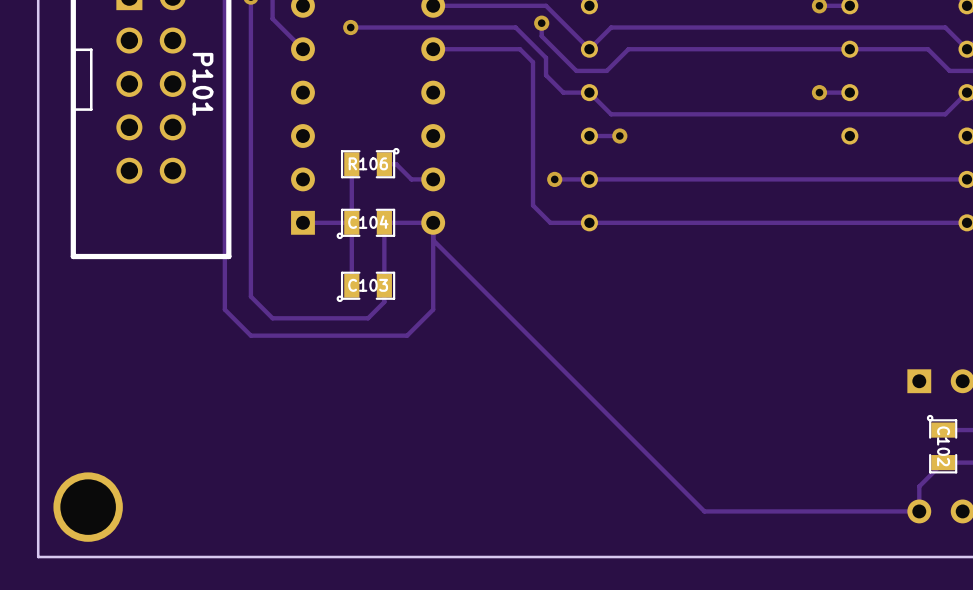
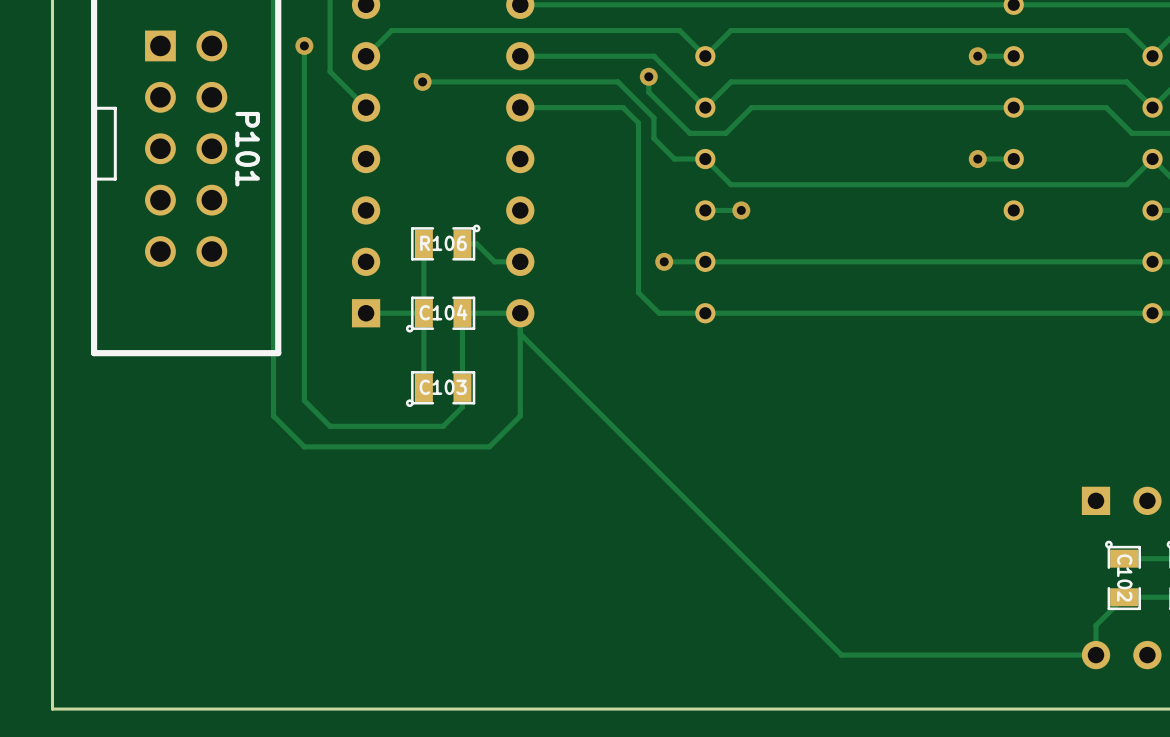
part: (88, 507) -> none

